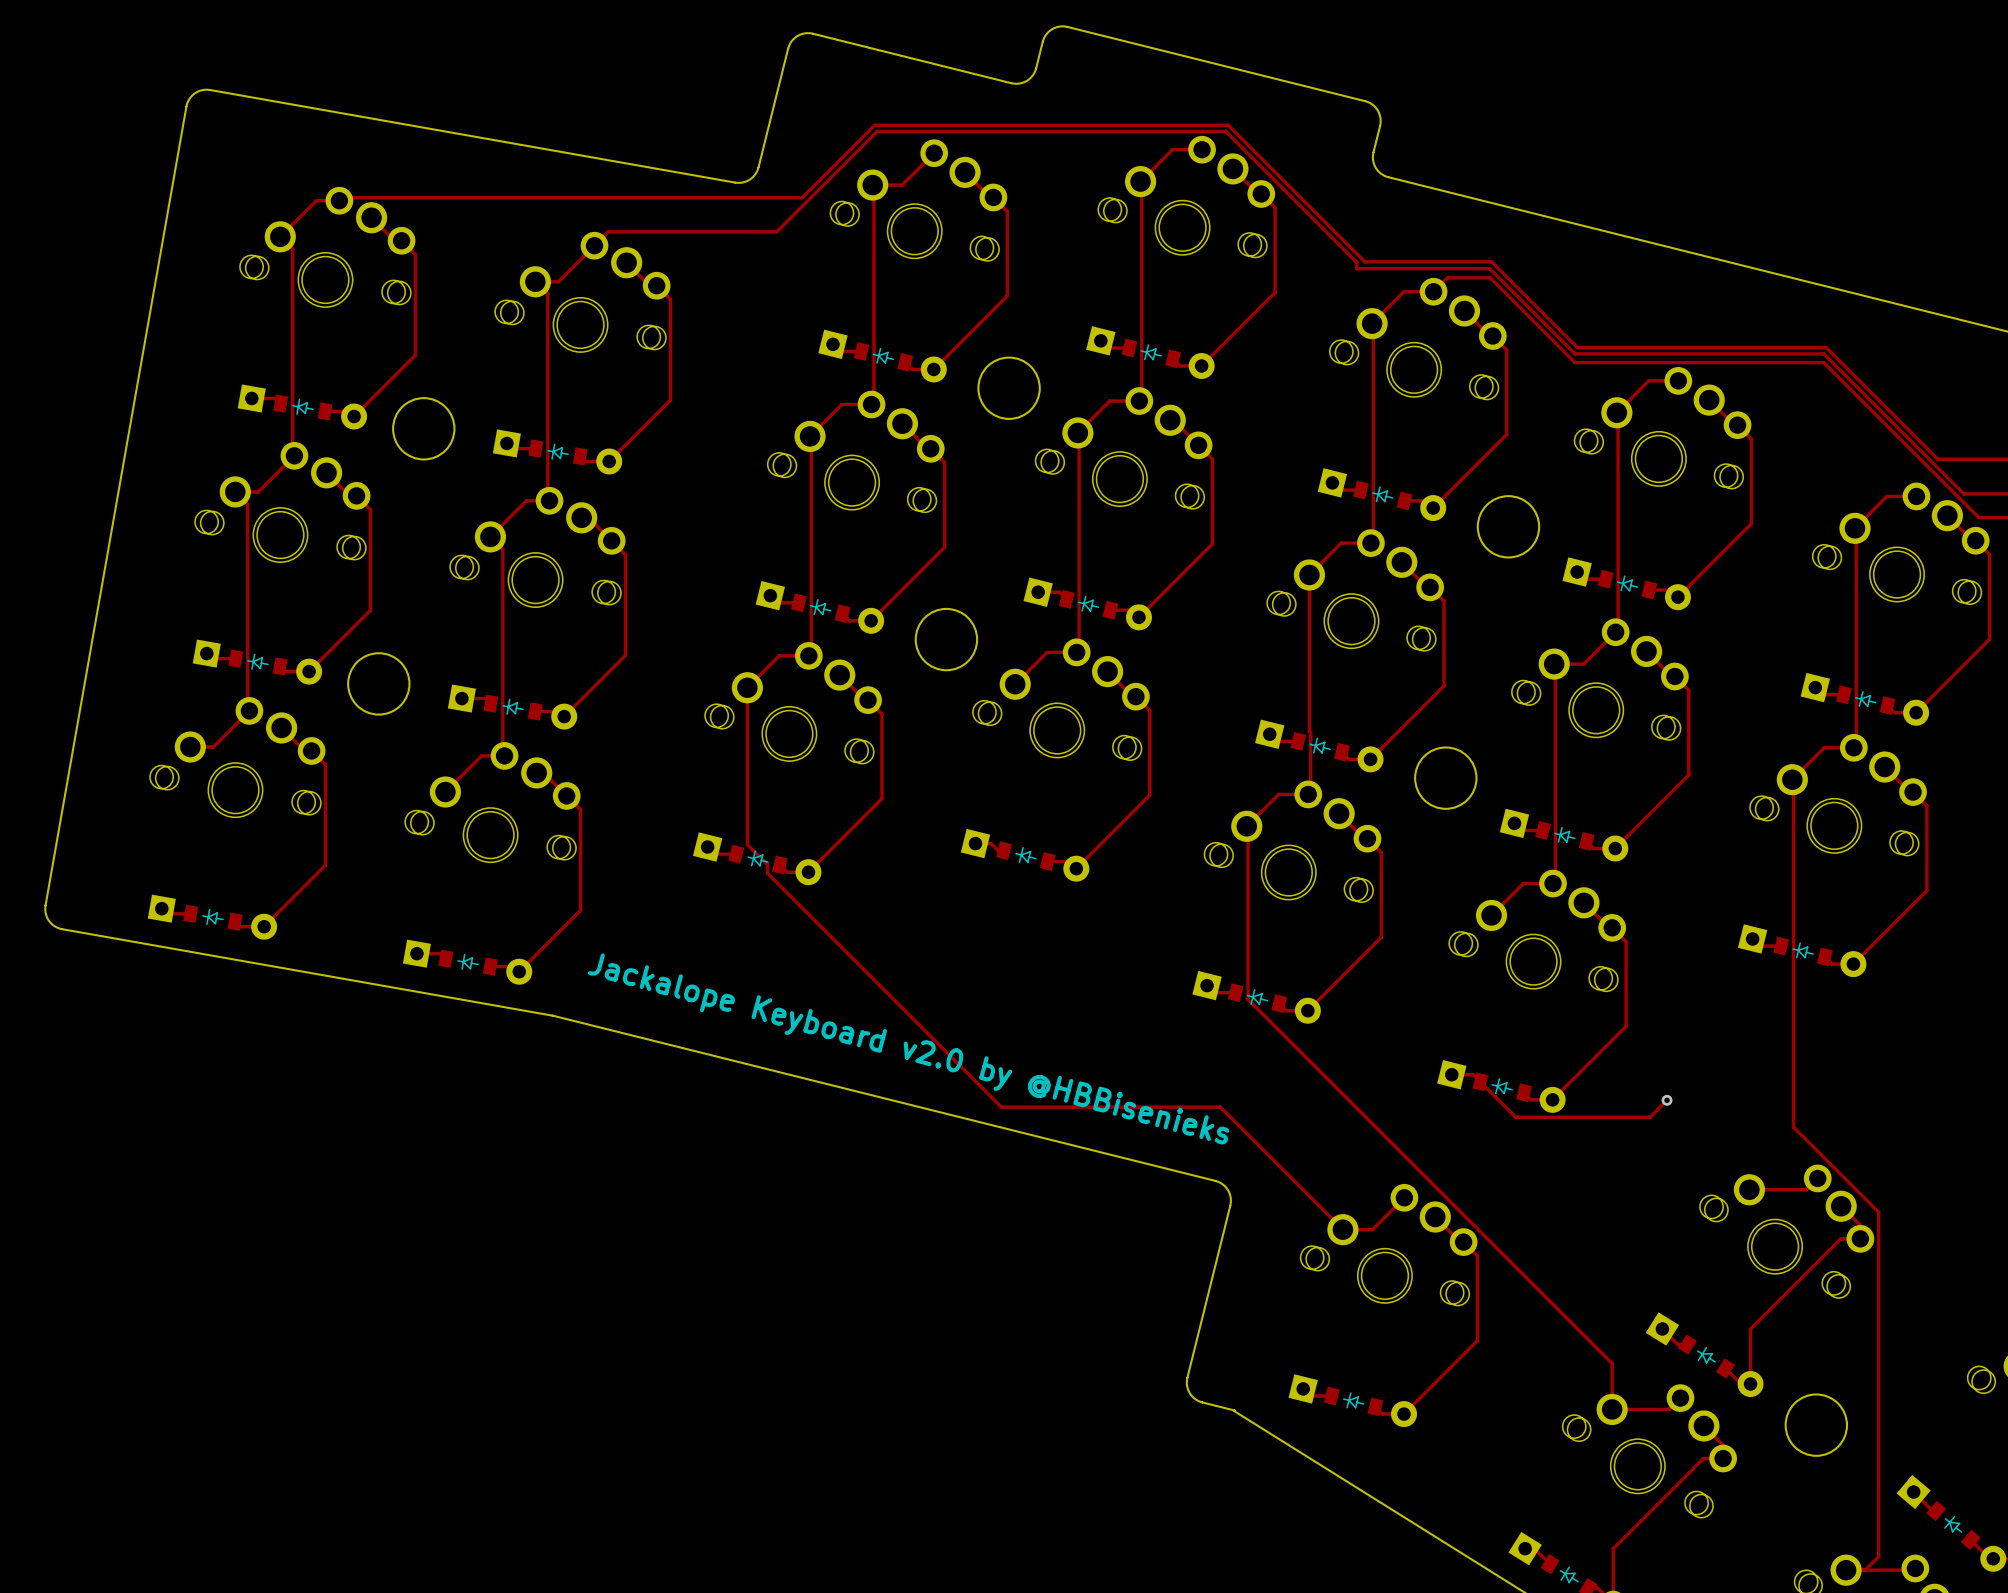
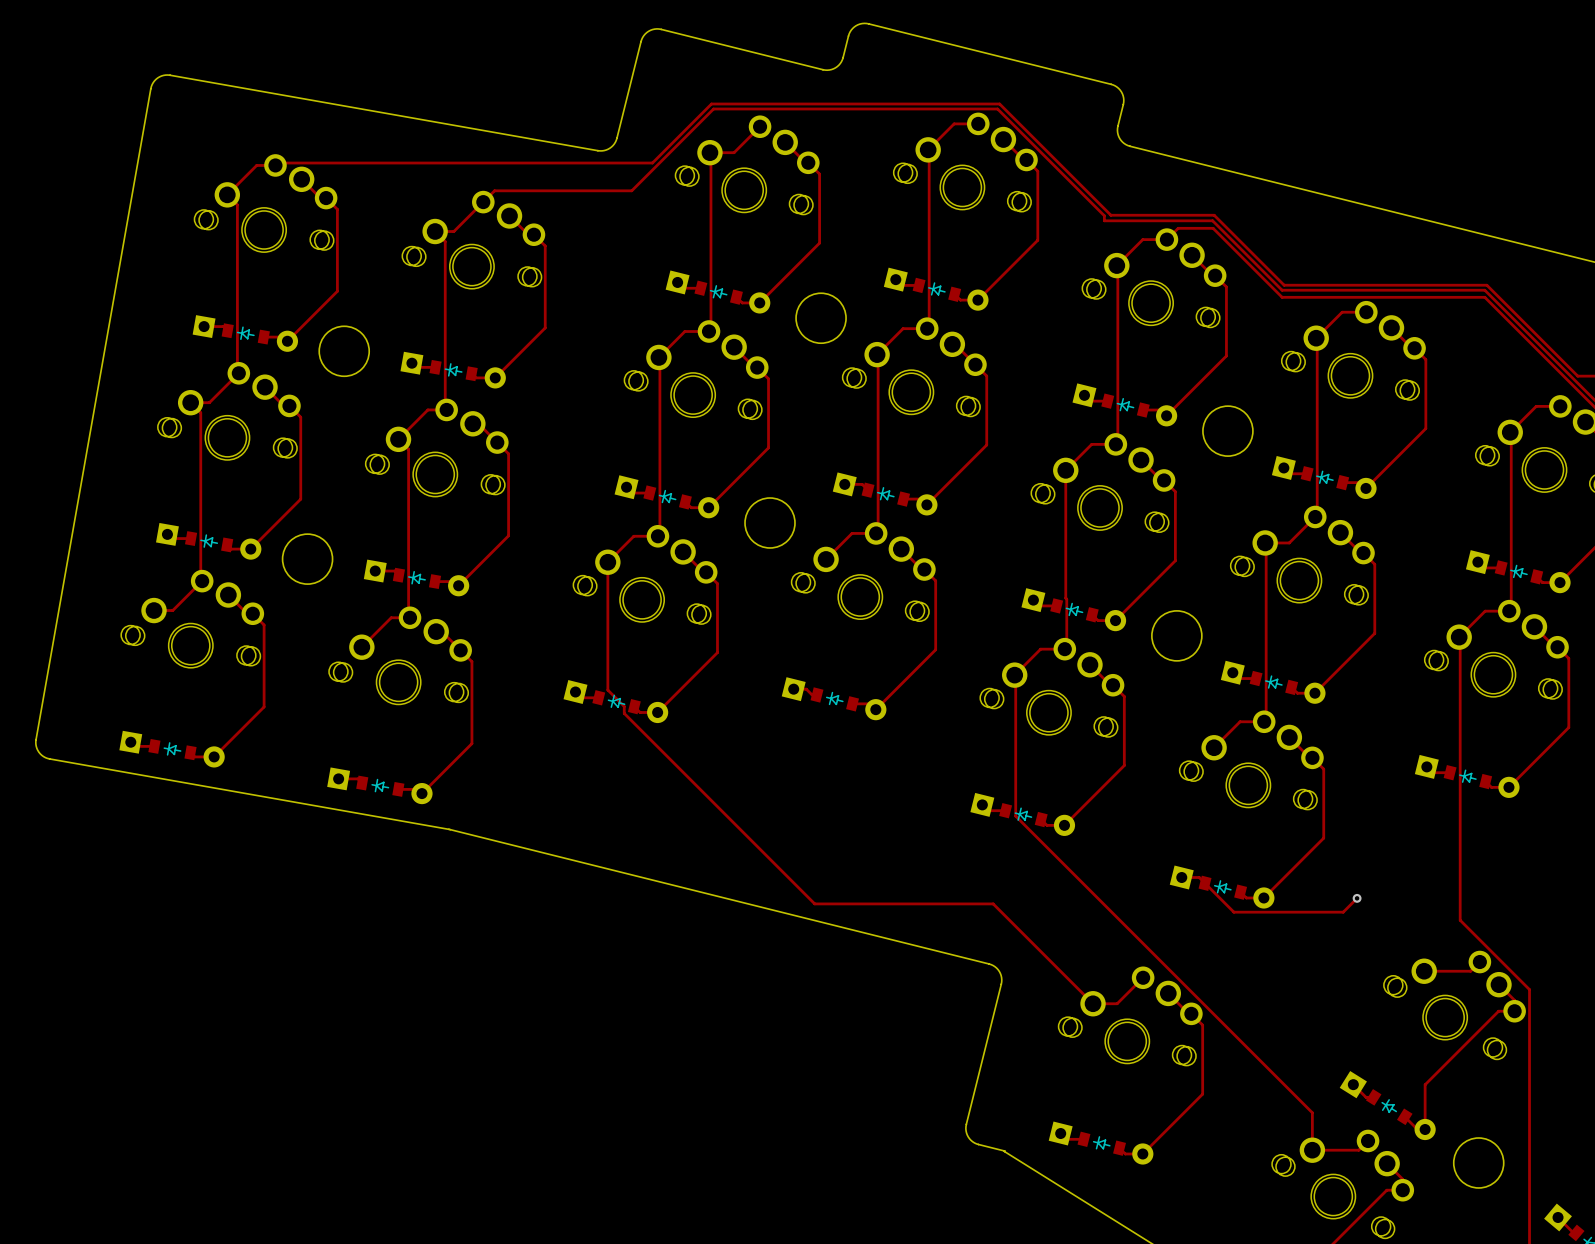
text: Jackalope Keyboard v2.0 by @HBBisenieks (908, 1048) -> none

